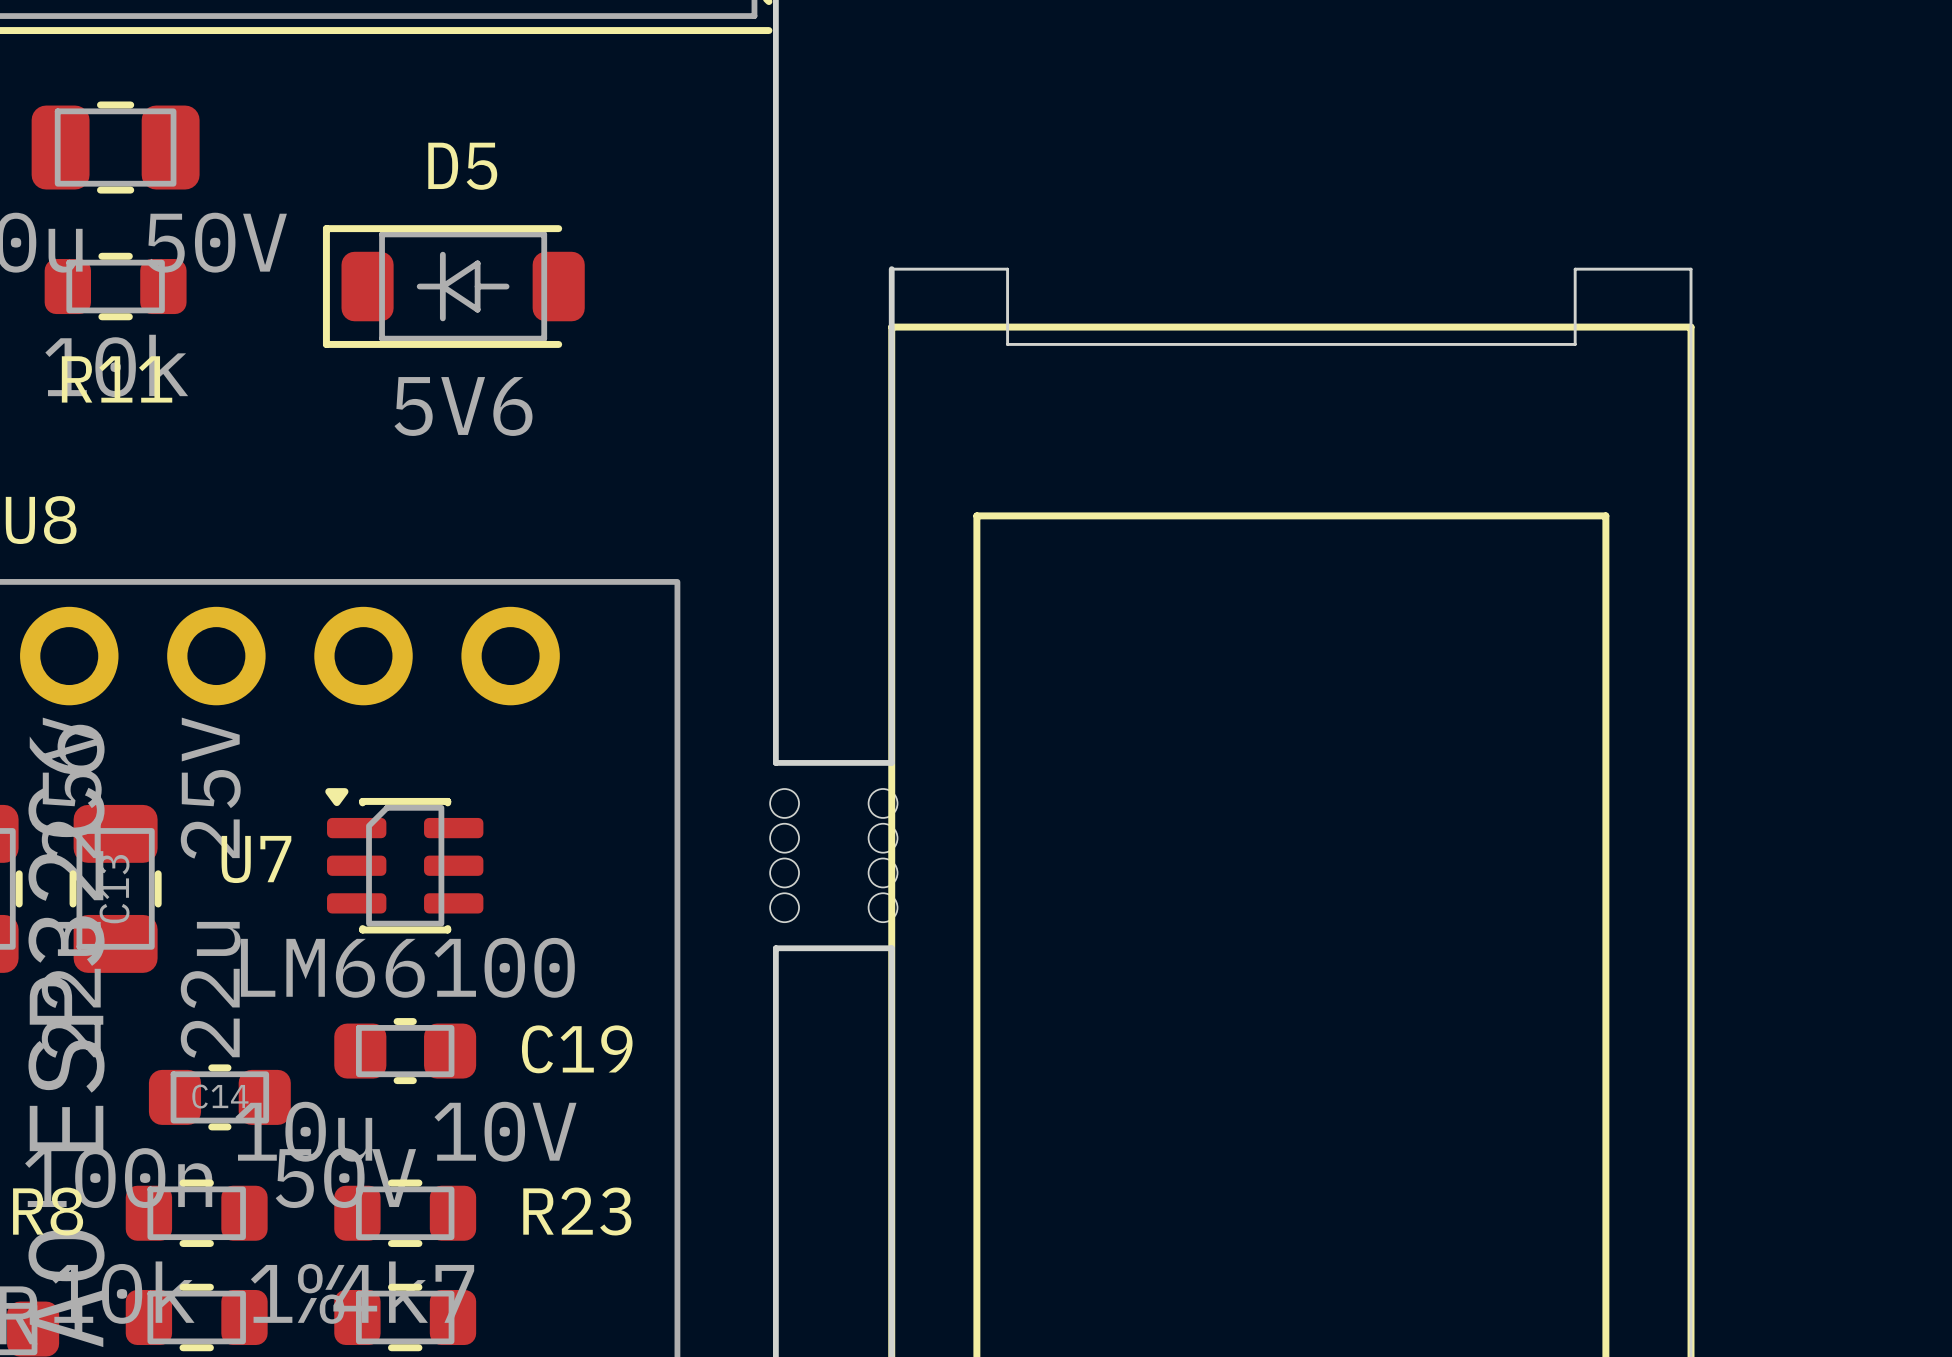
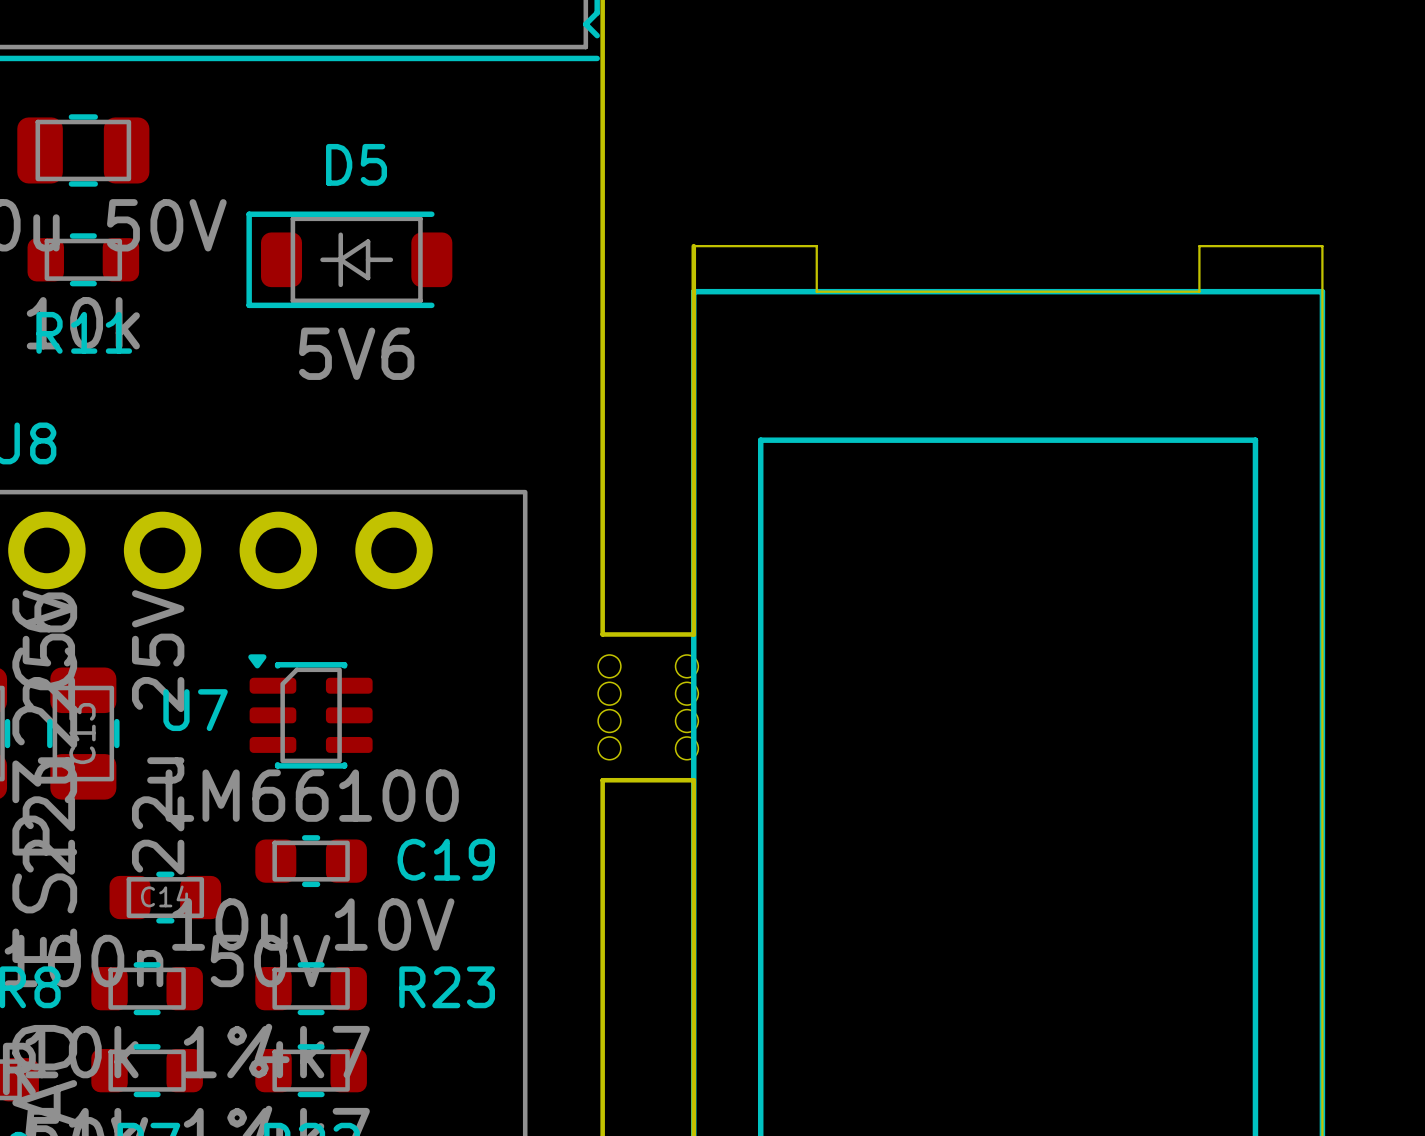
board edge: (1007, 269) (1007, 344) (1575, 344) (1575, 269) -> (784, 246) (816, 246) (816, 291) (1199, 291) (1199, 246) (1231, 246)

